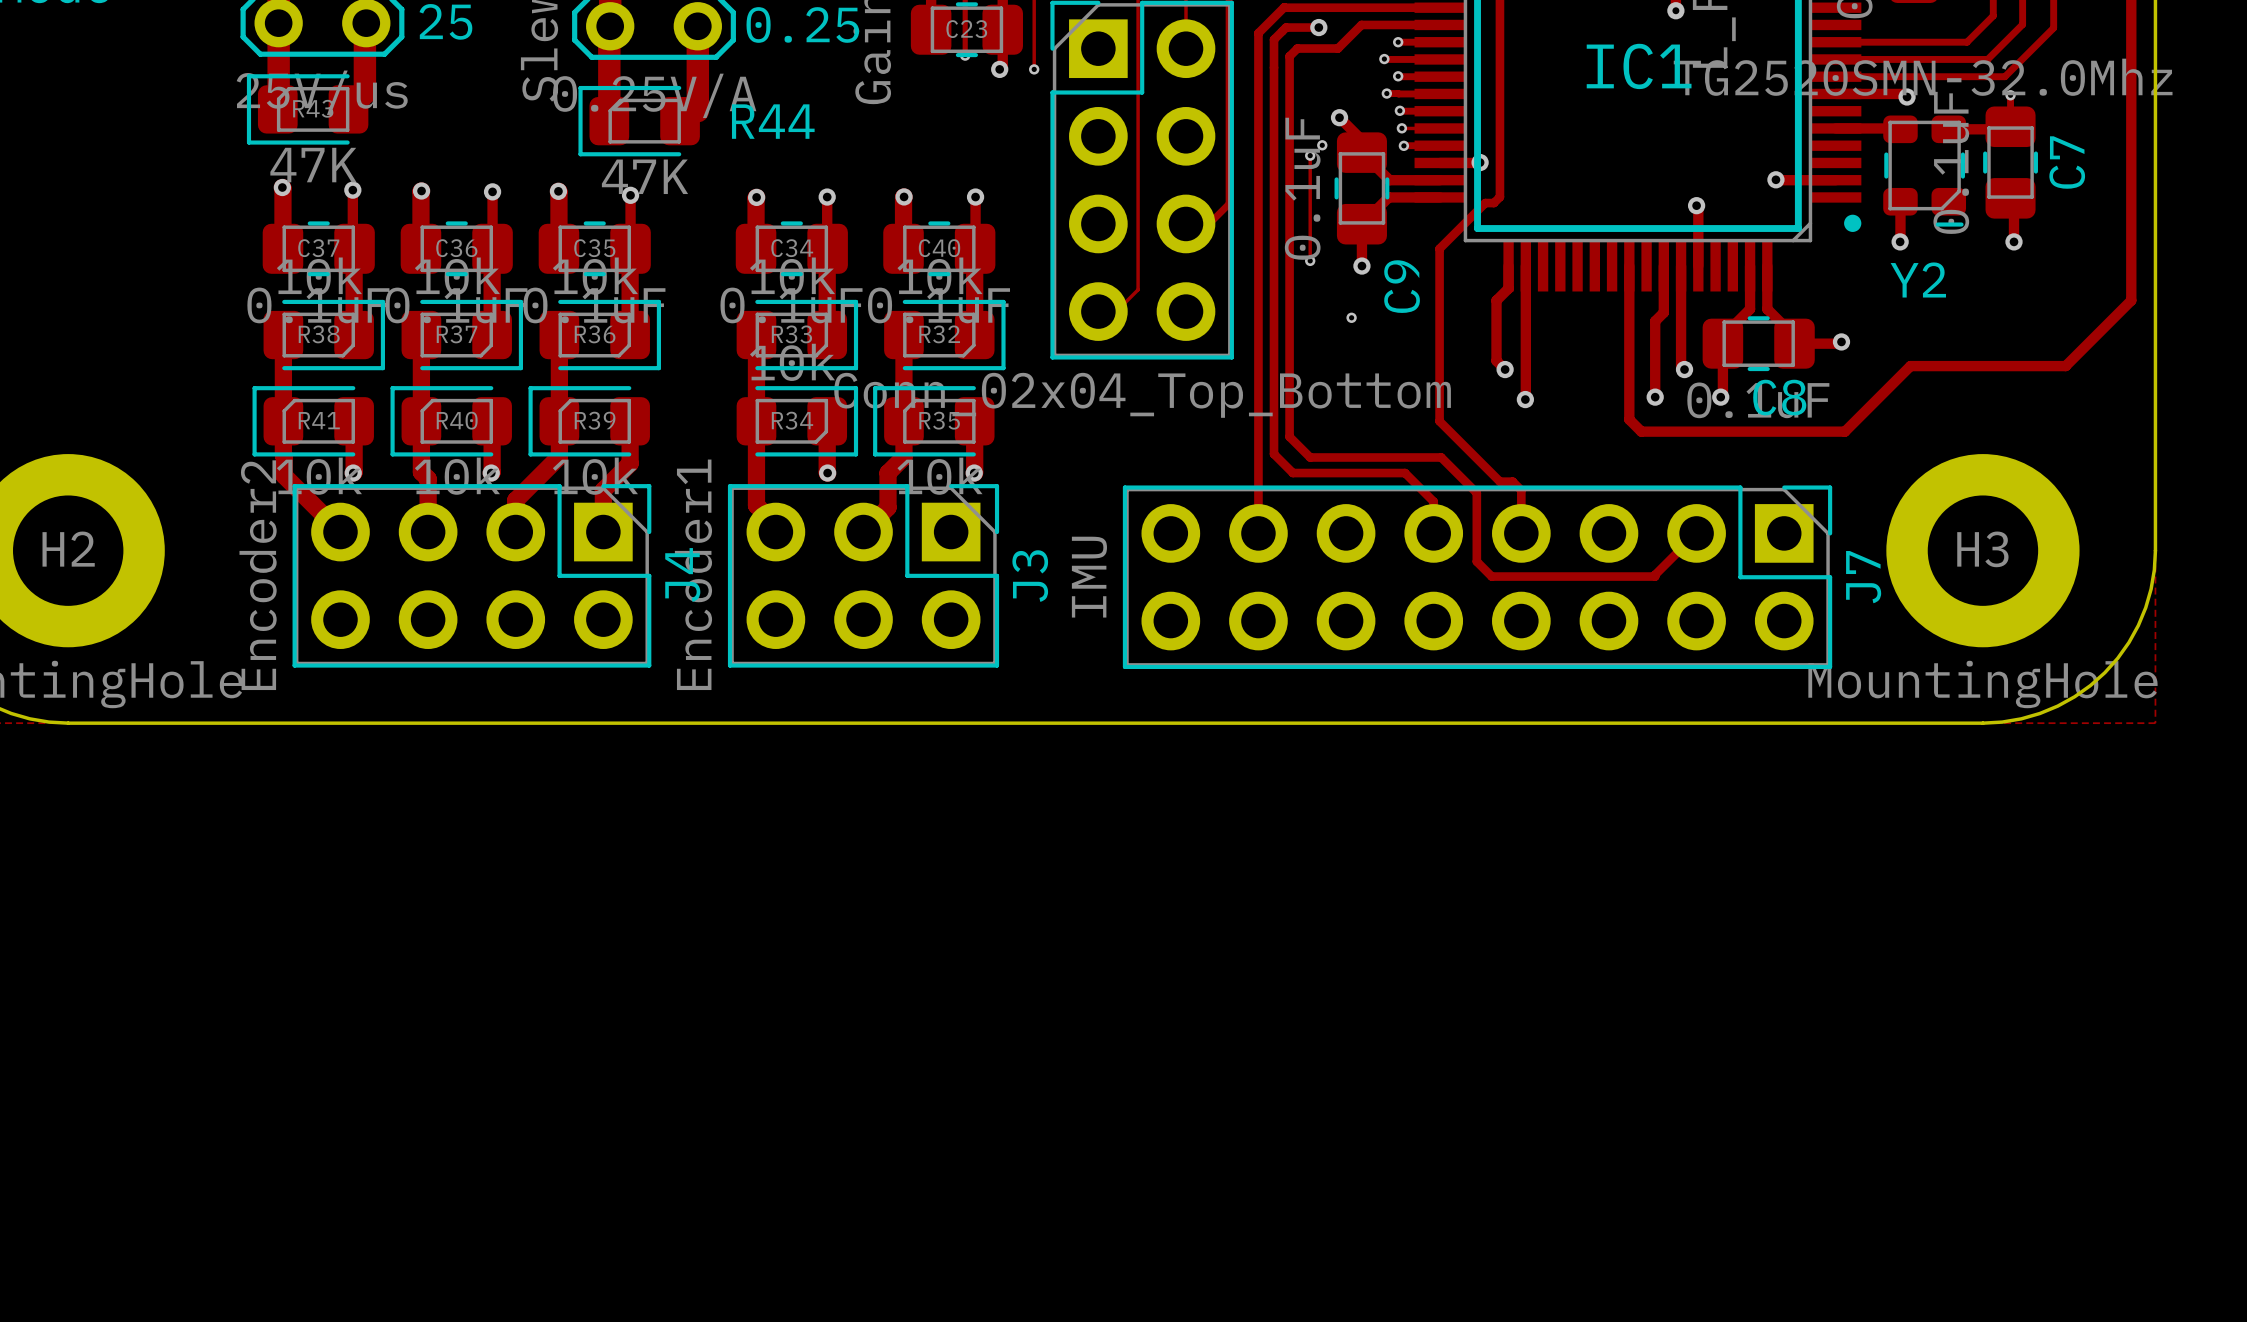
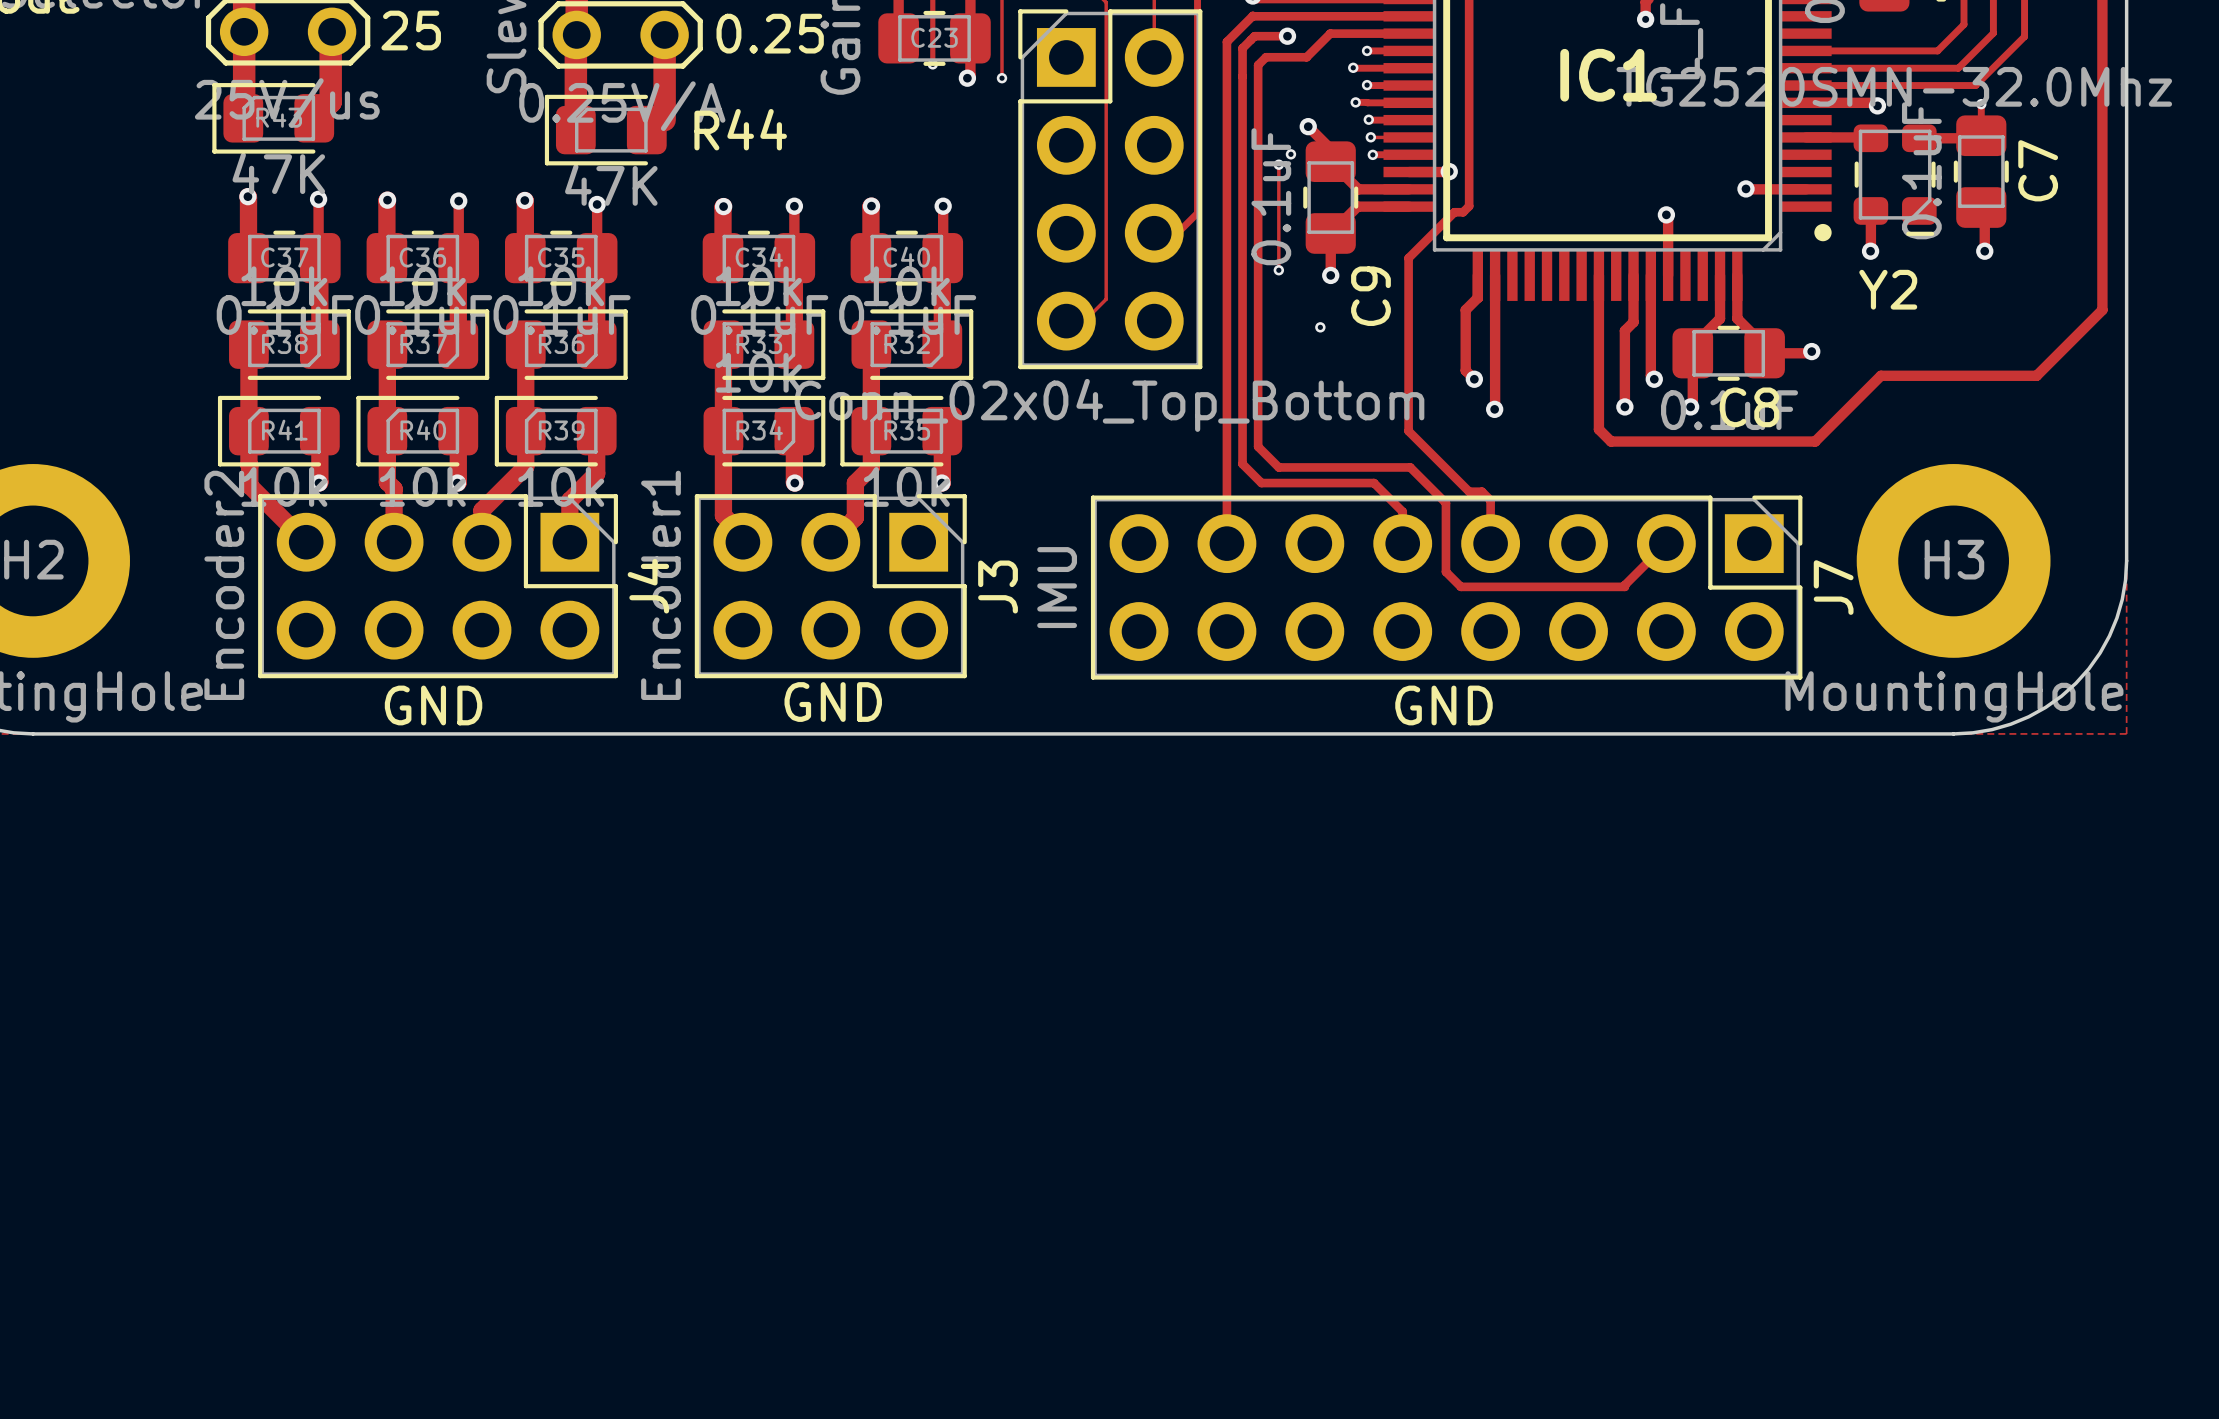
text: none -> GND (833, 702)
text: none -> GND (433, 705)
text: none -> GND (1443, 705)

